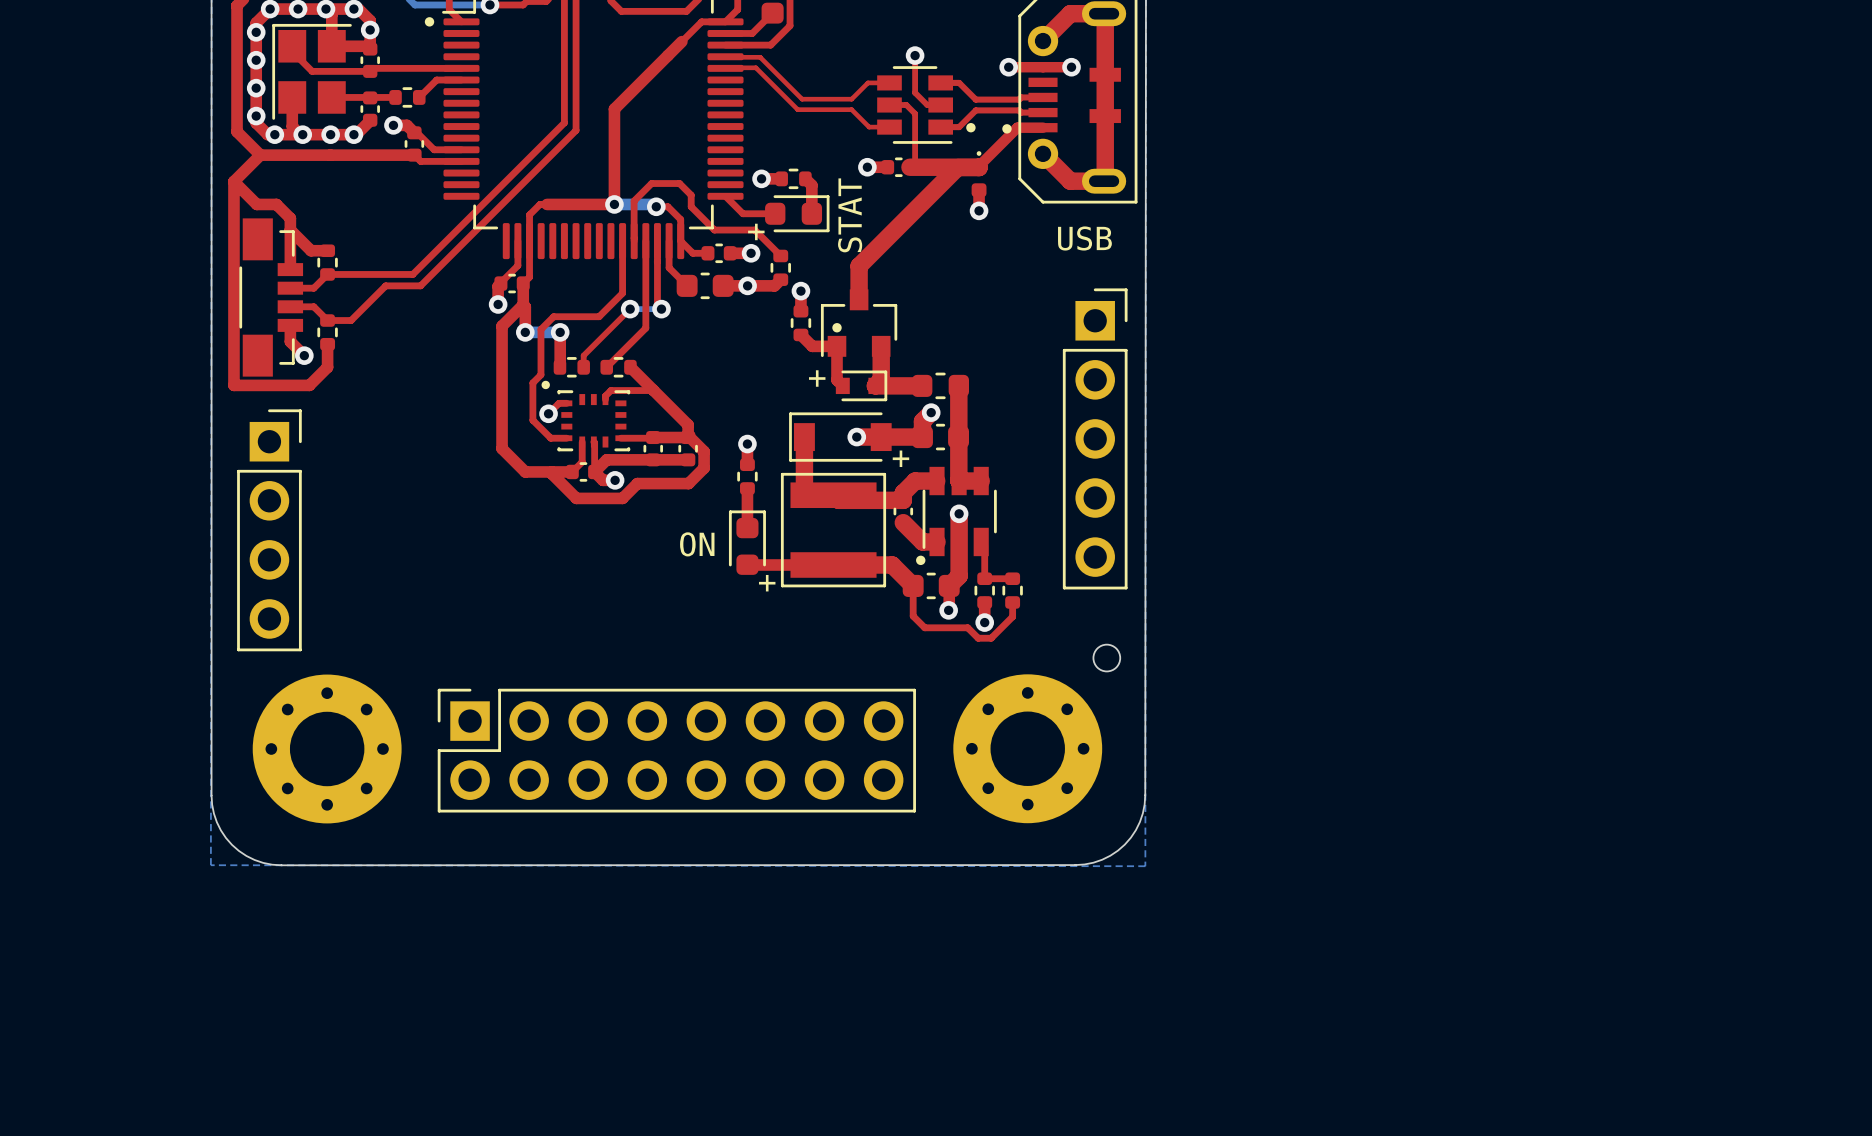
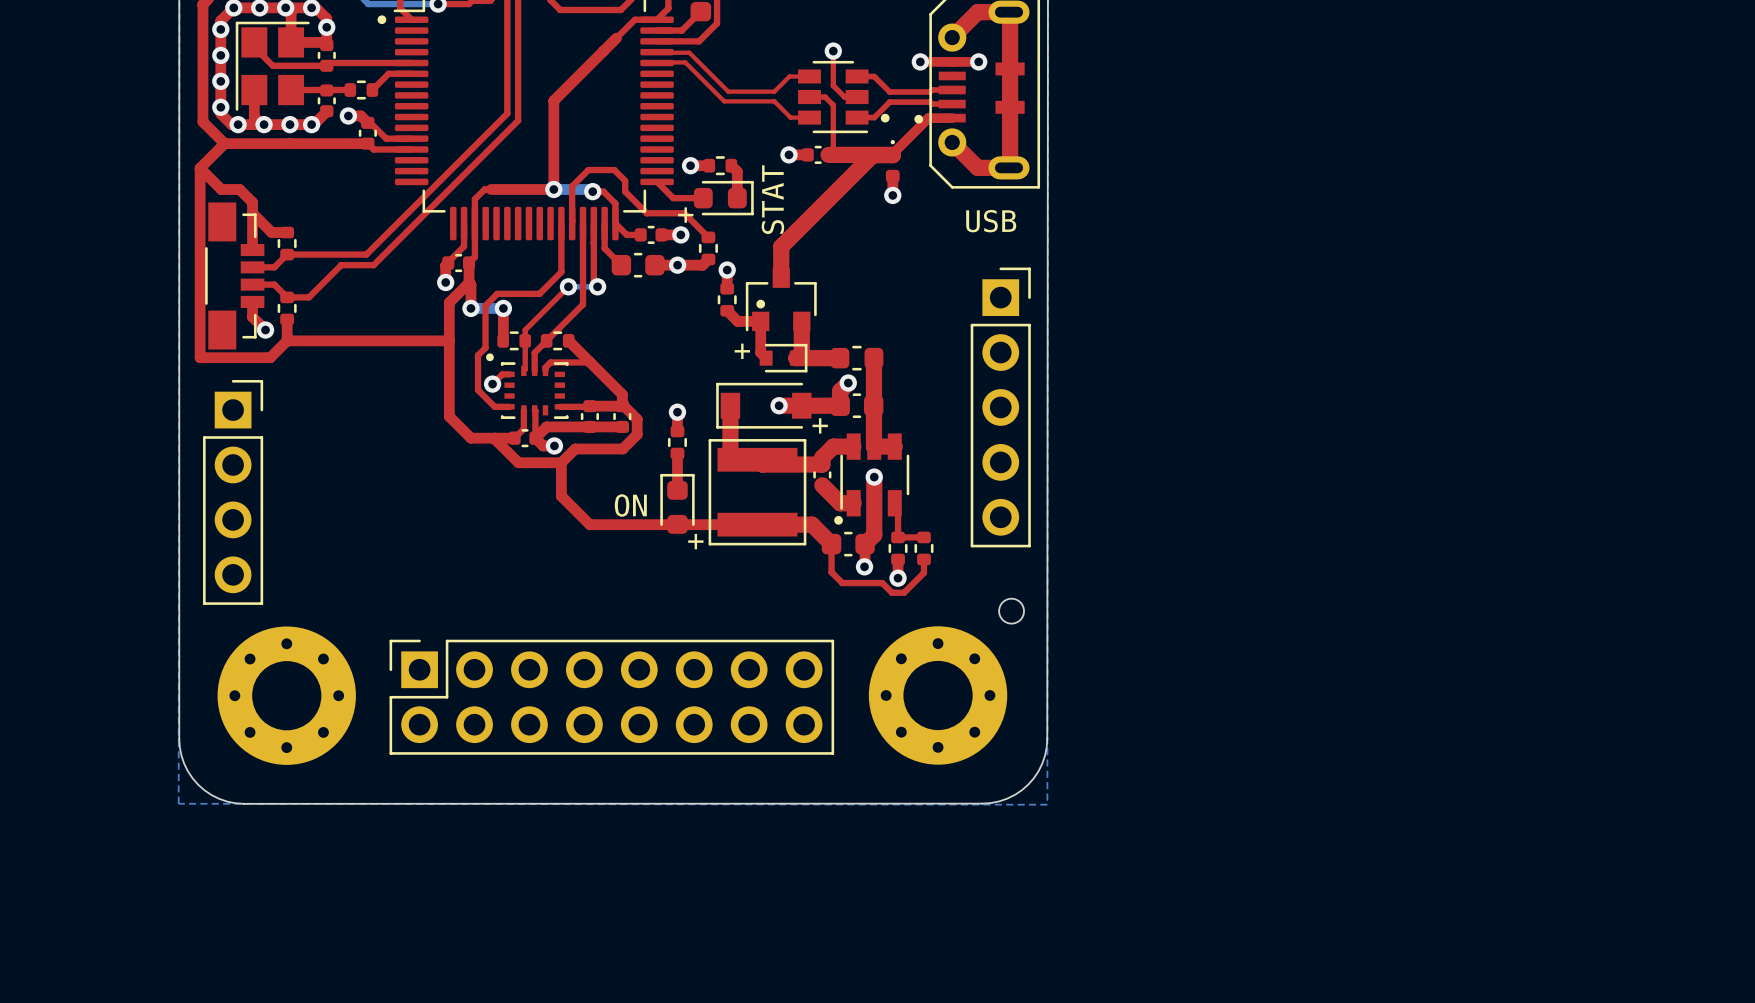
top track: none -> (287, 340) (449, 340)
top track: none -> (525, 340) (523, 370)
top track: none -> (546, 340) (534, 352) (534, 370)
top track: none -> (561, 462) (561, 496) (589, 524) (677, 524)

